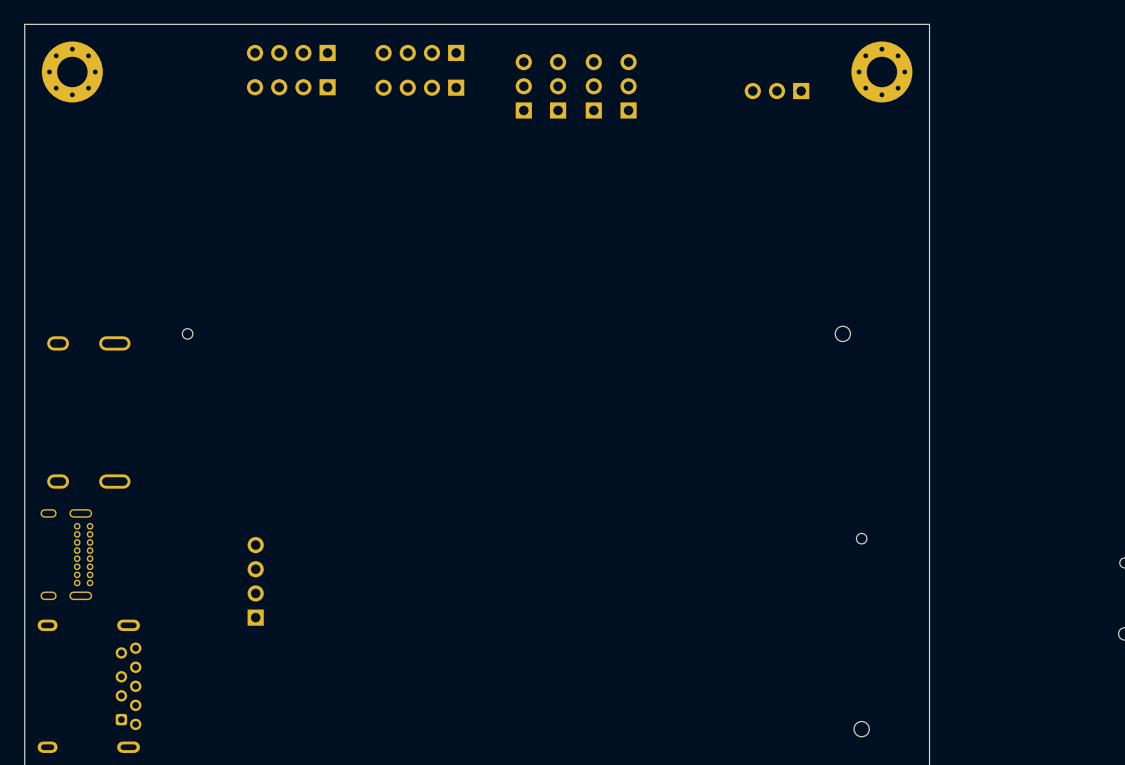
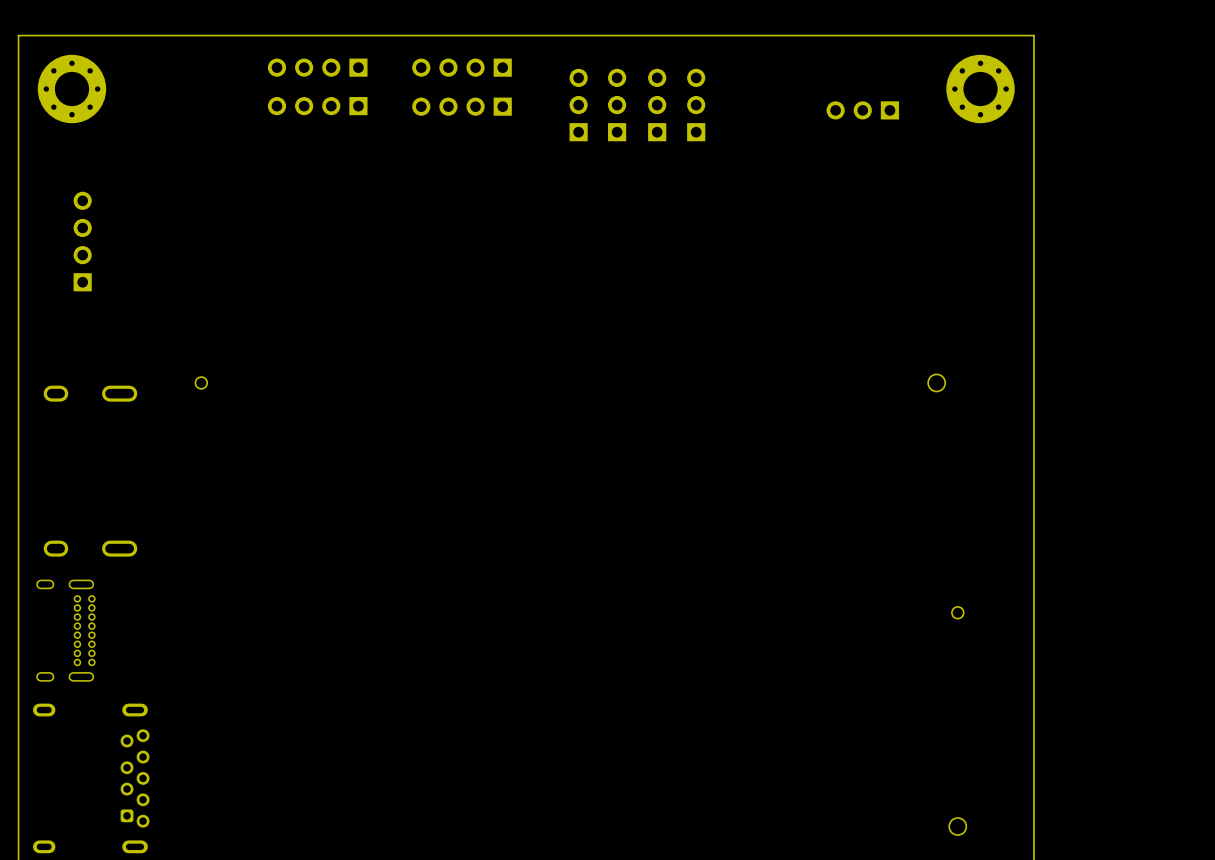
part: none -> (82, 241)
part: (255, 581) -> none

